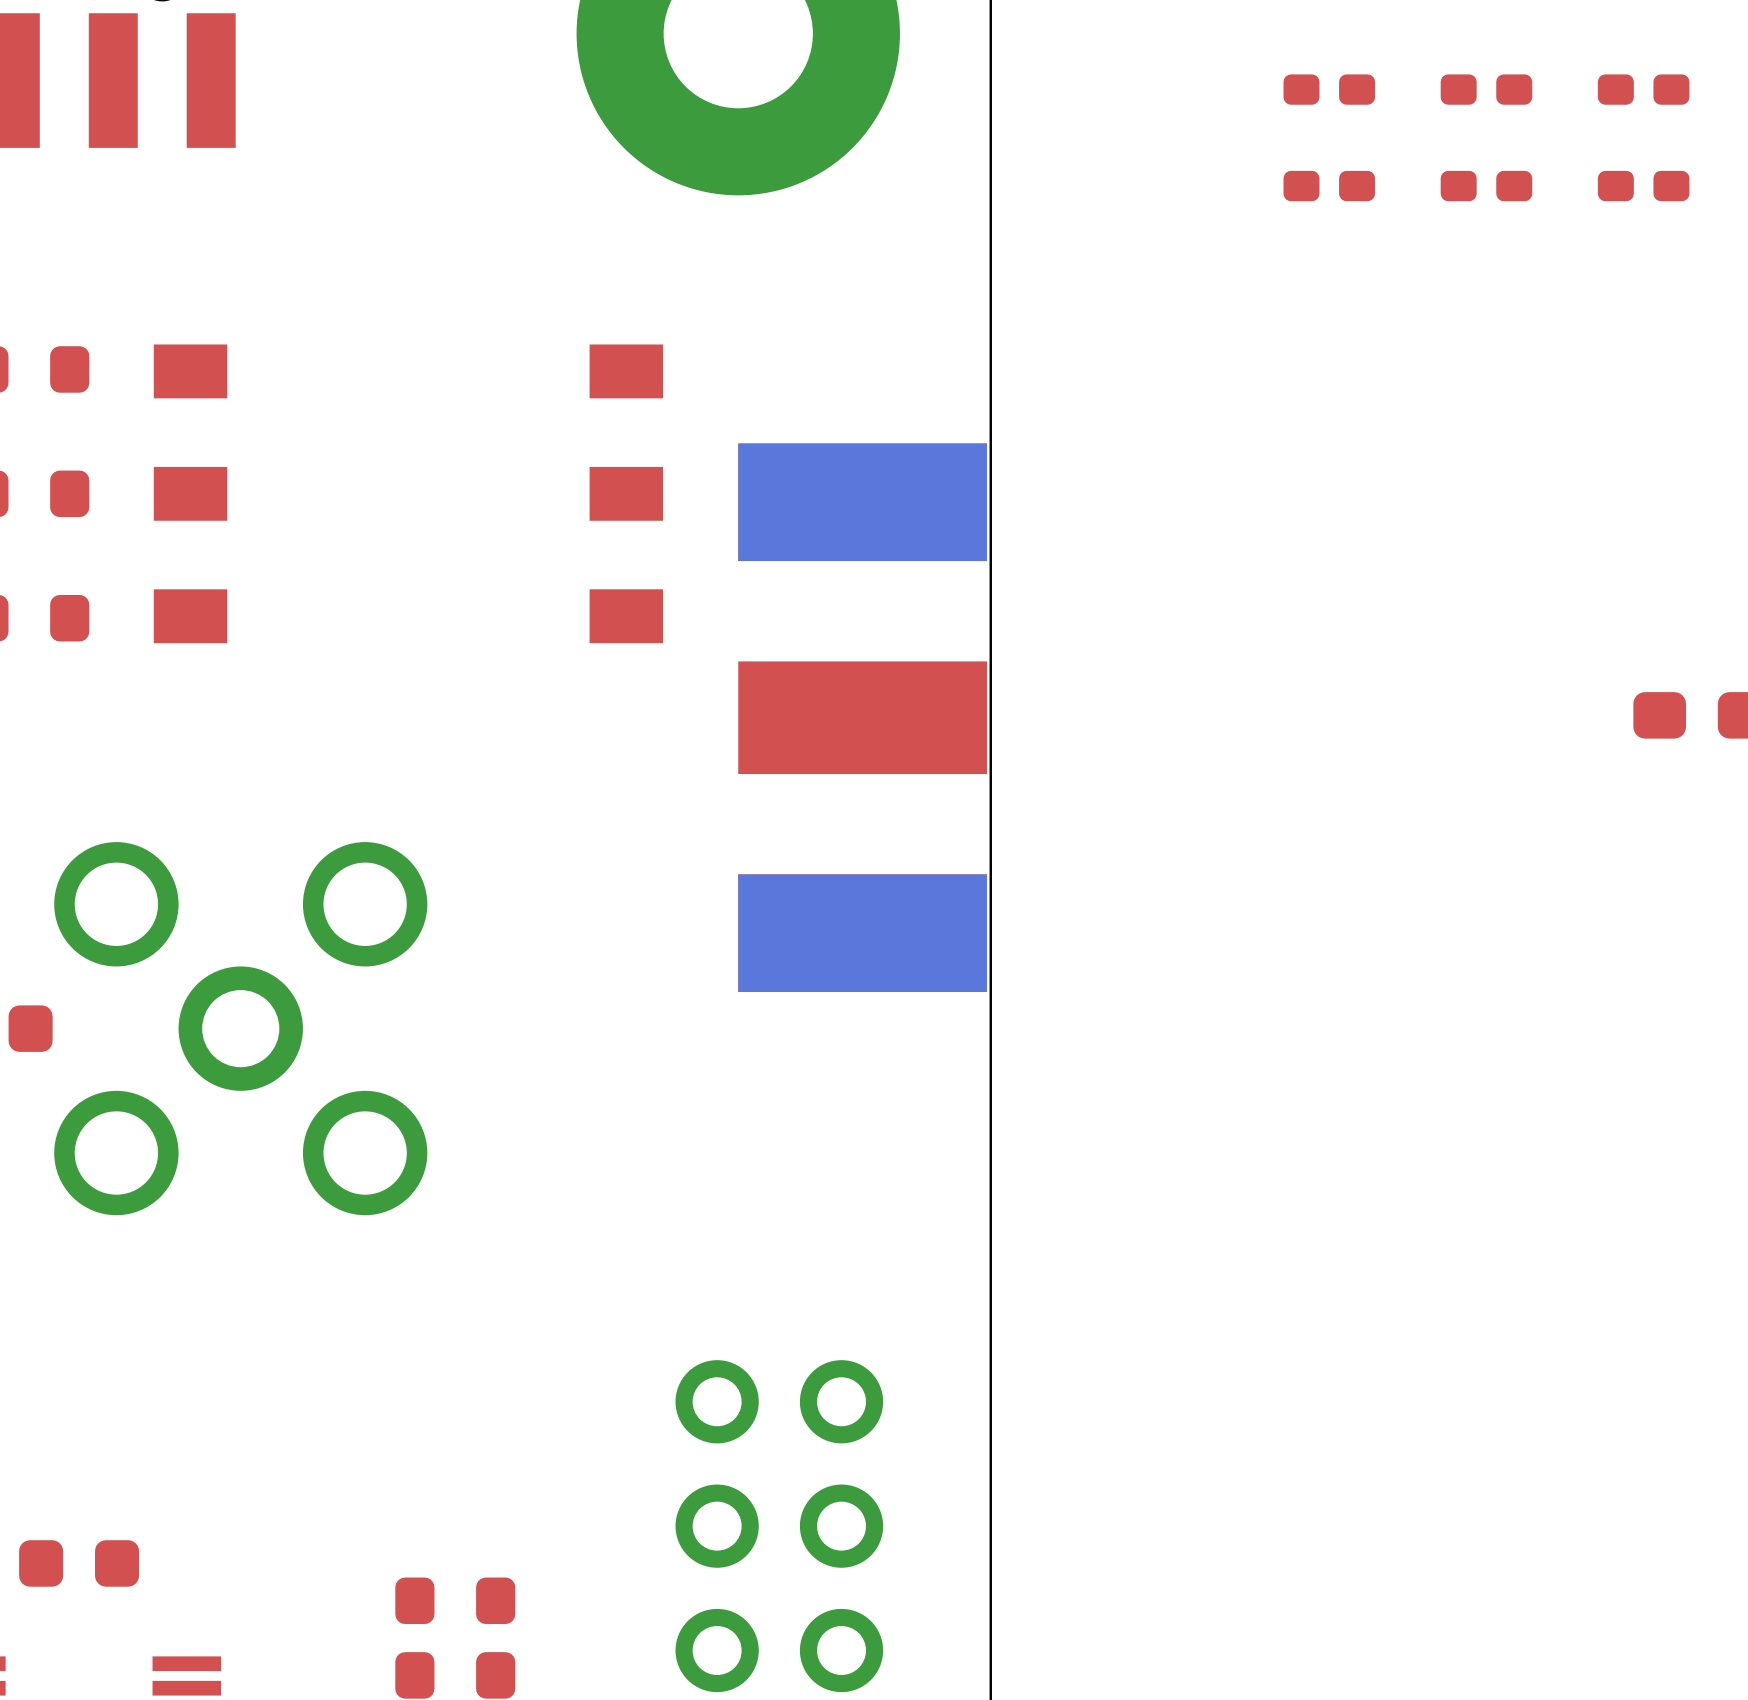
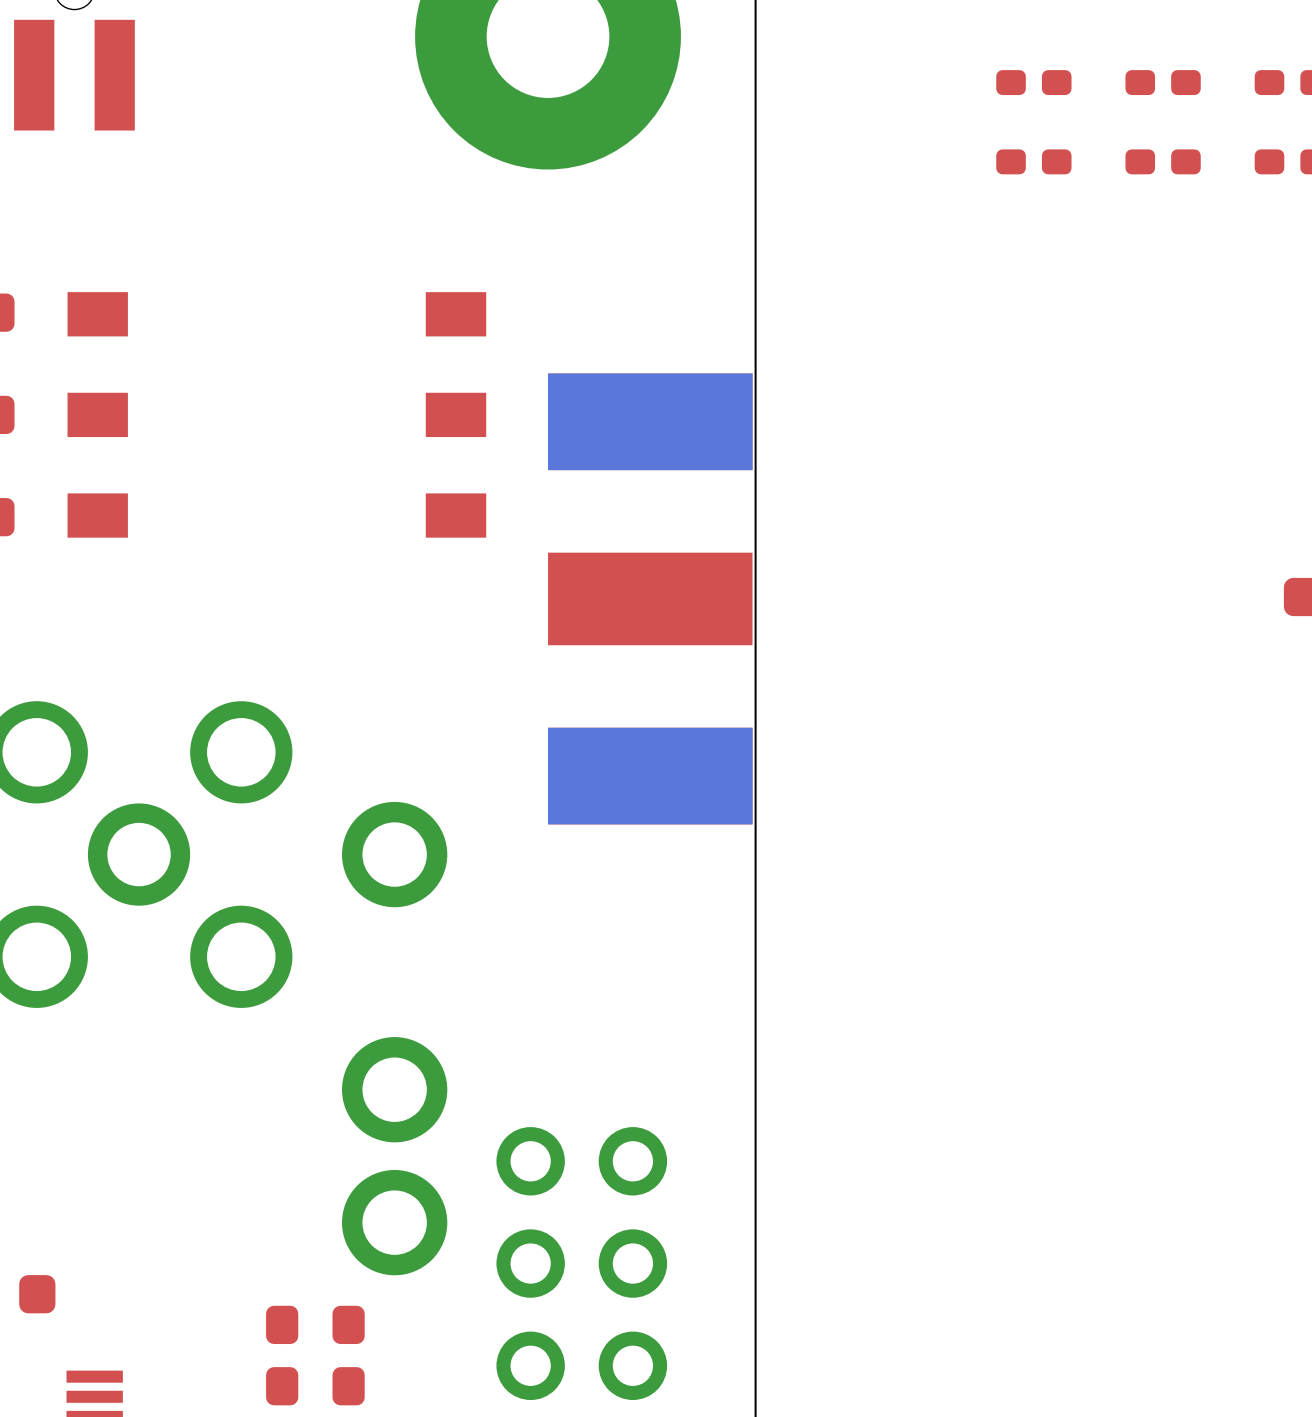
part: none -> (394, 854)
part: none -> (394, 1089)
part: none -> (394, 1222)

